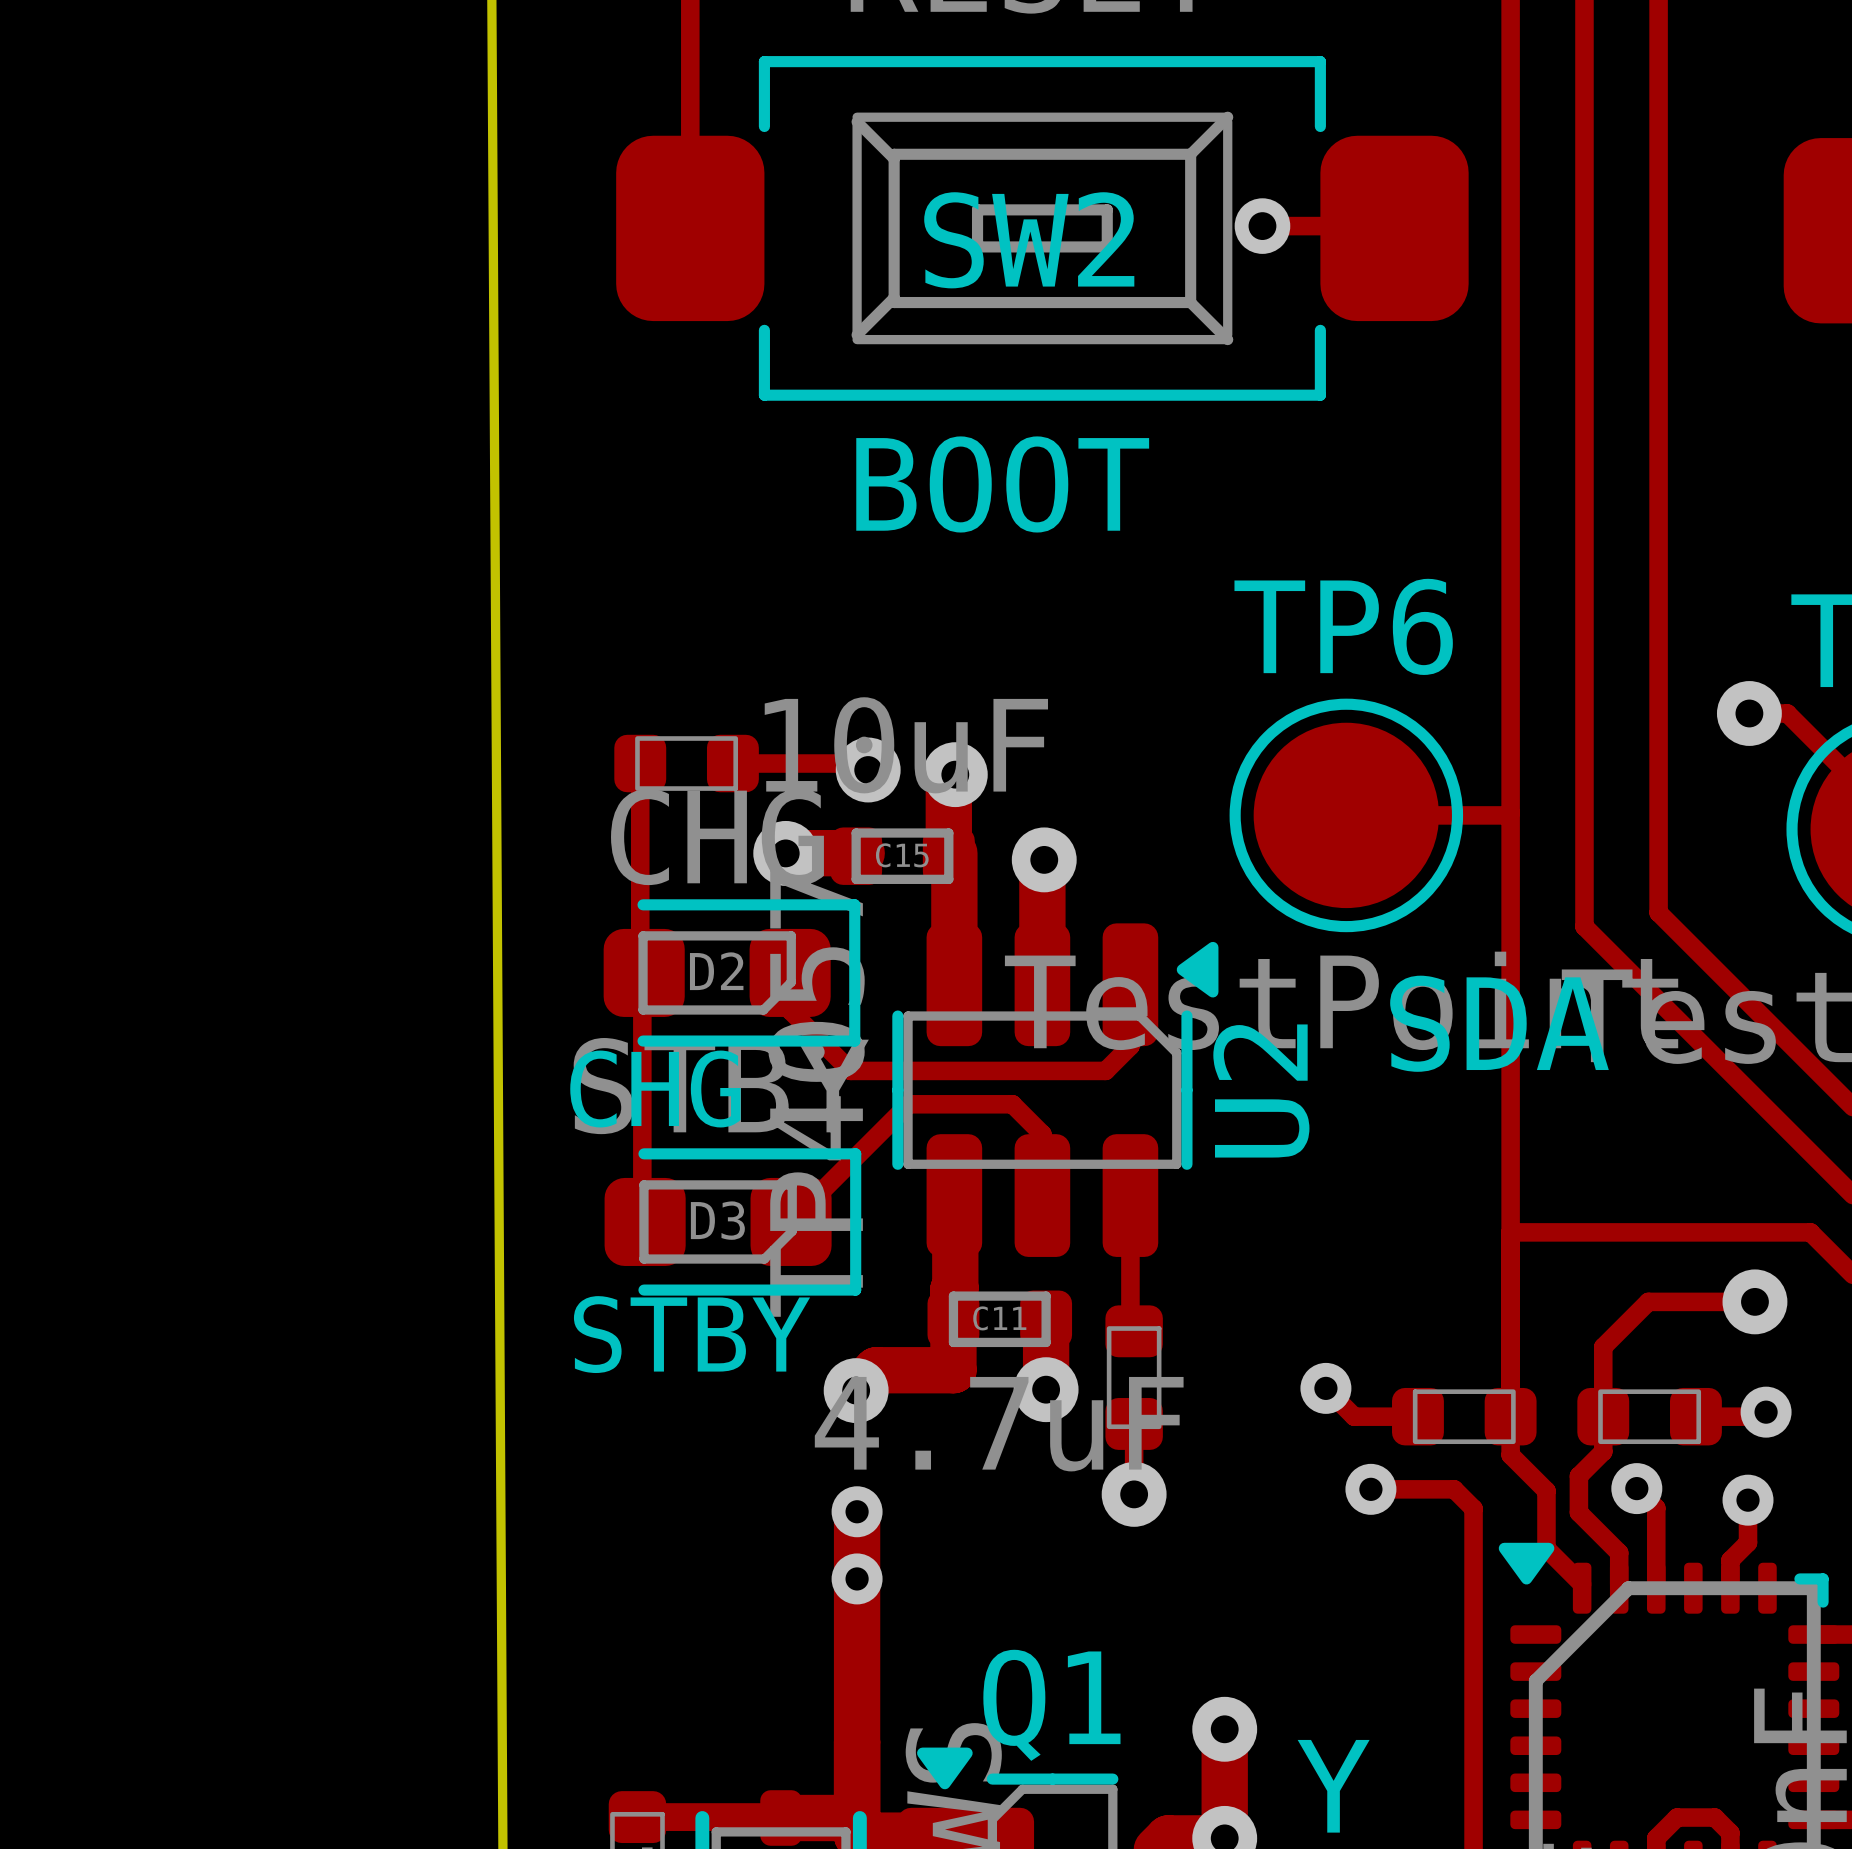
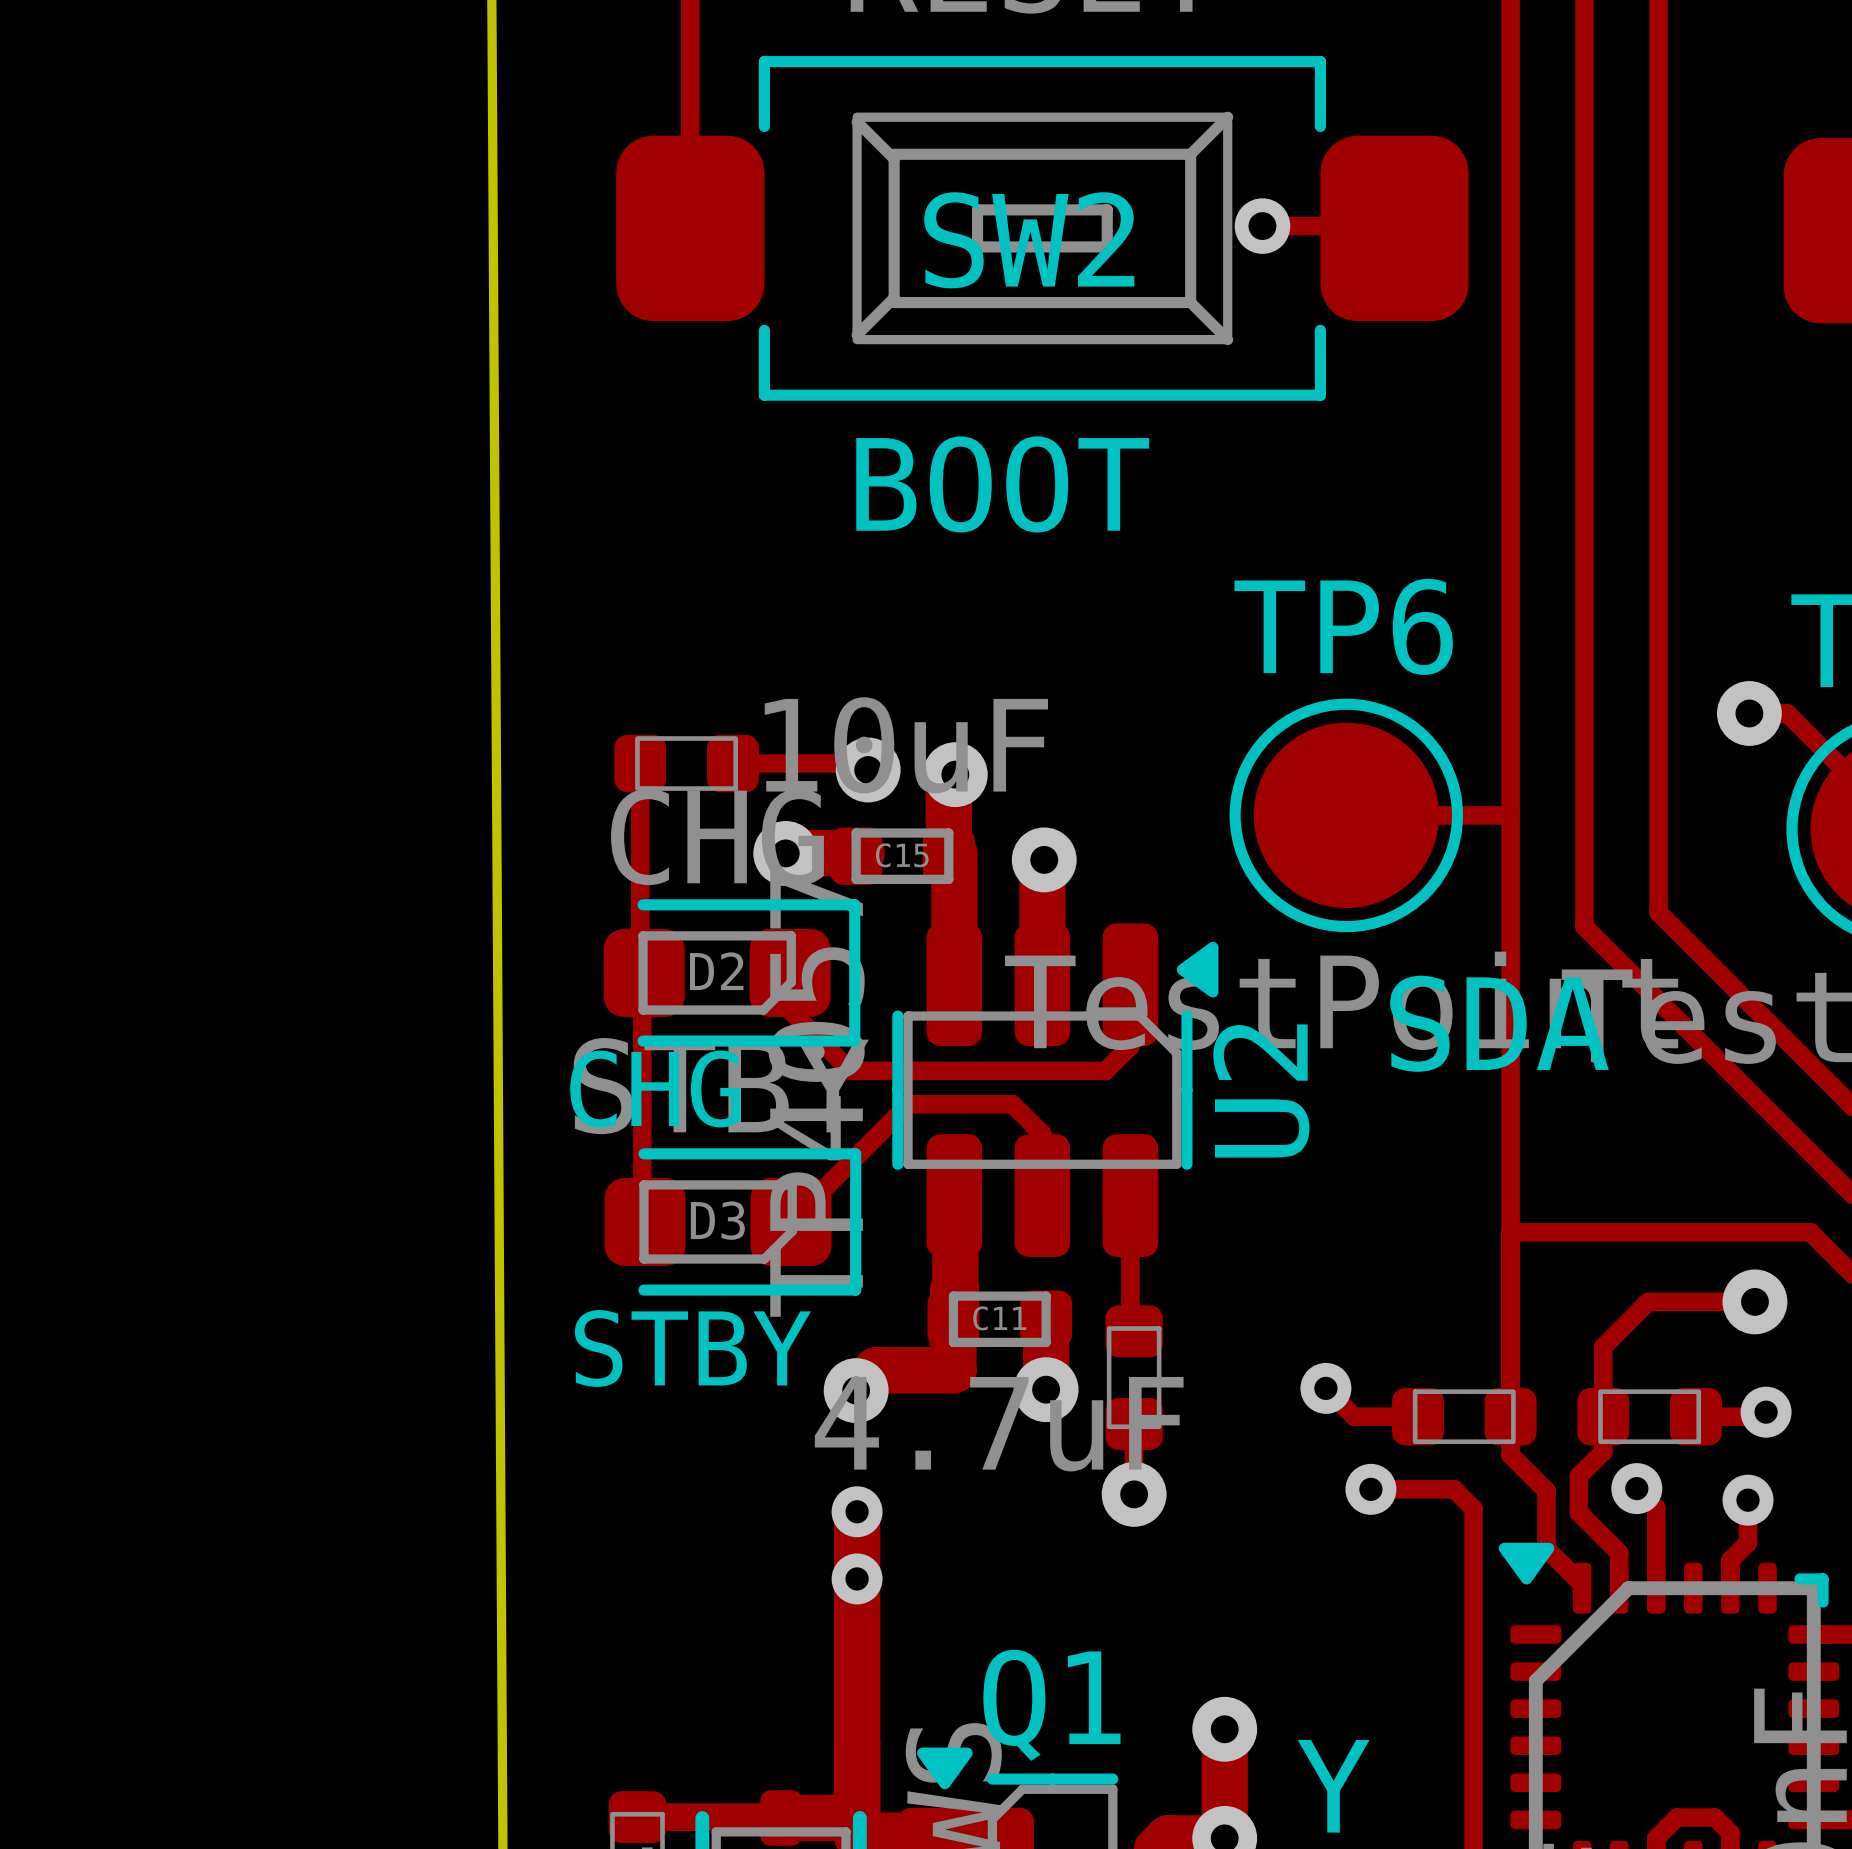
text position: STBY (692, 1334) -> STBY (692, 1348)

